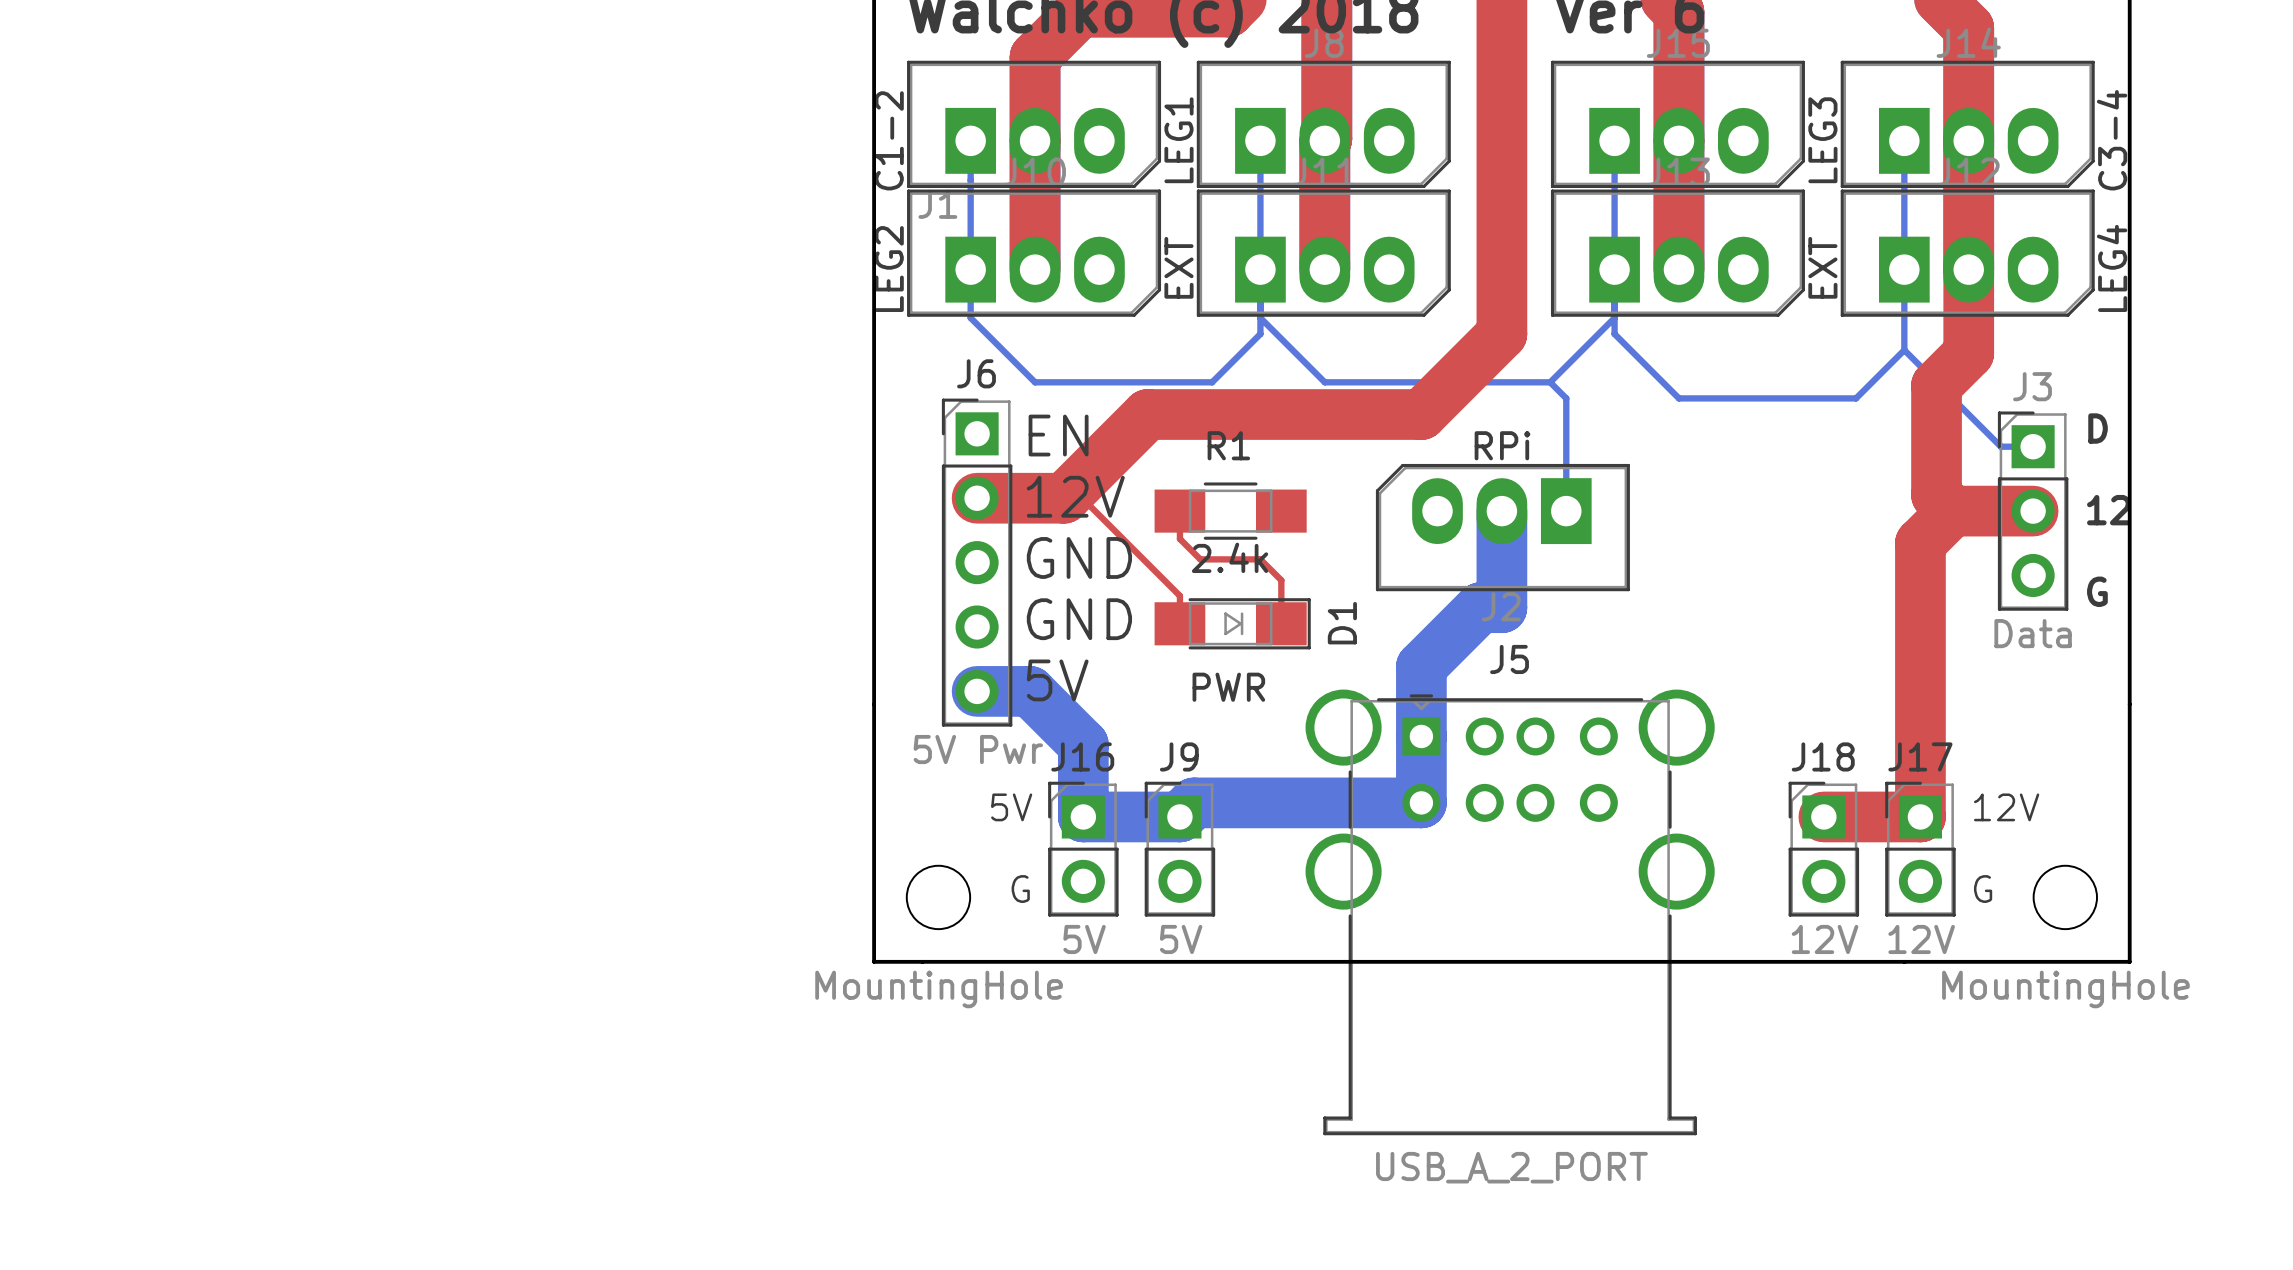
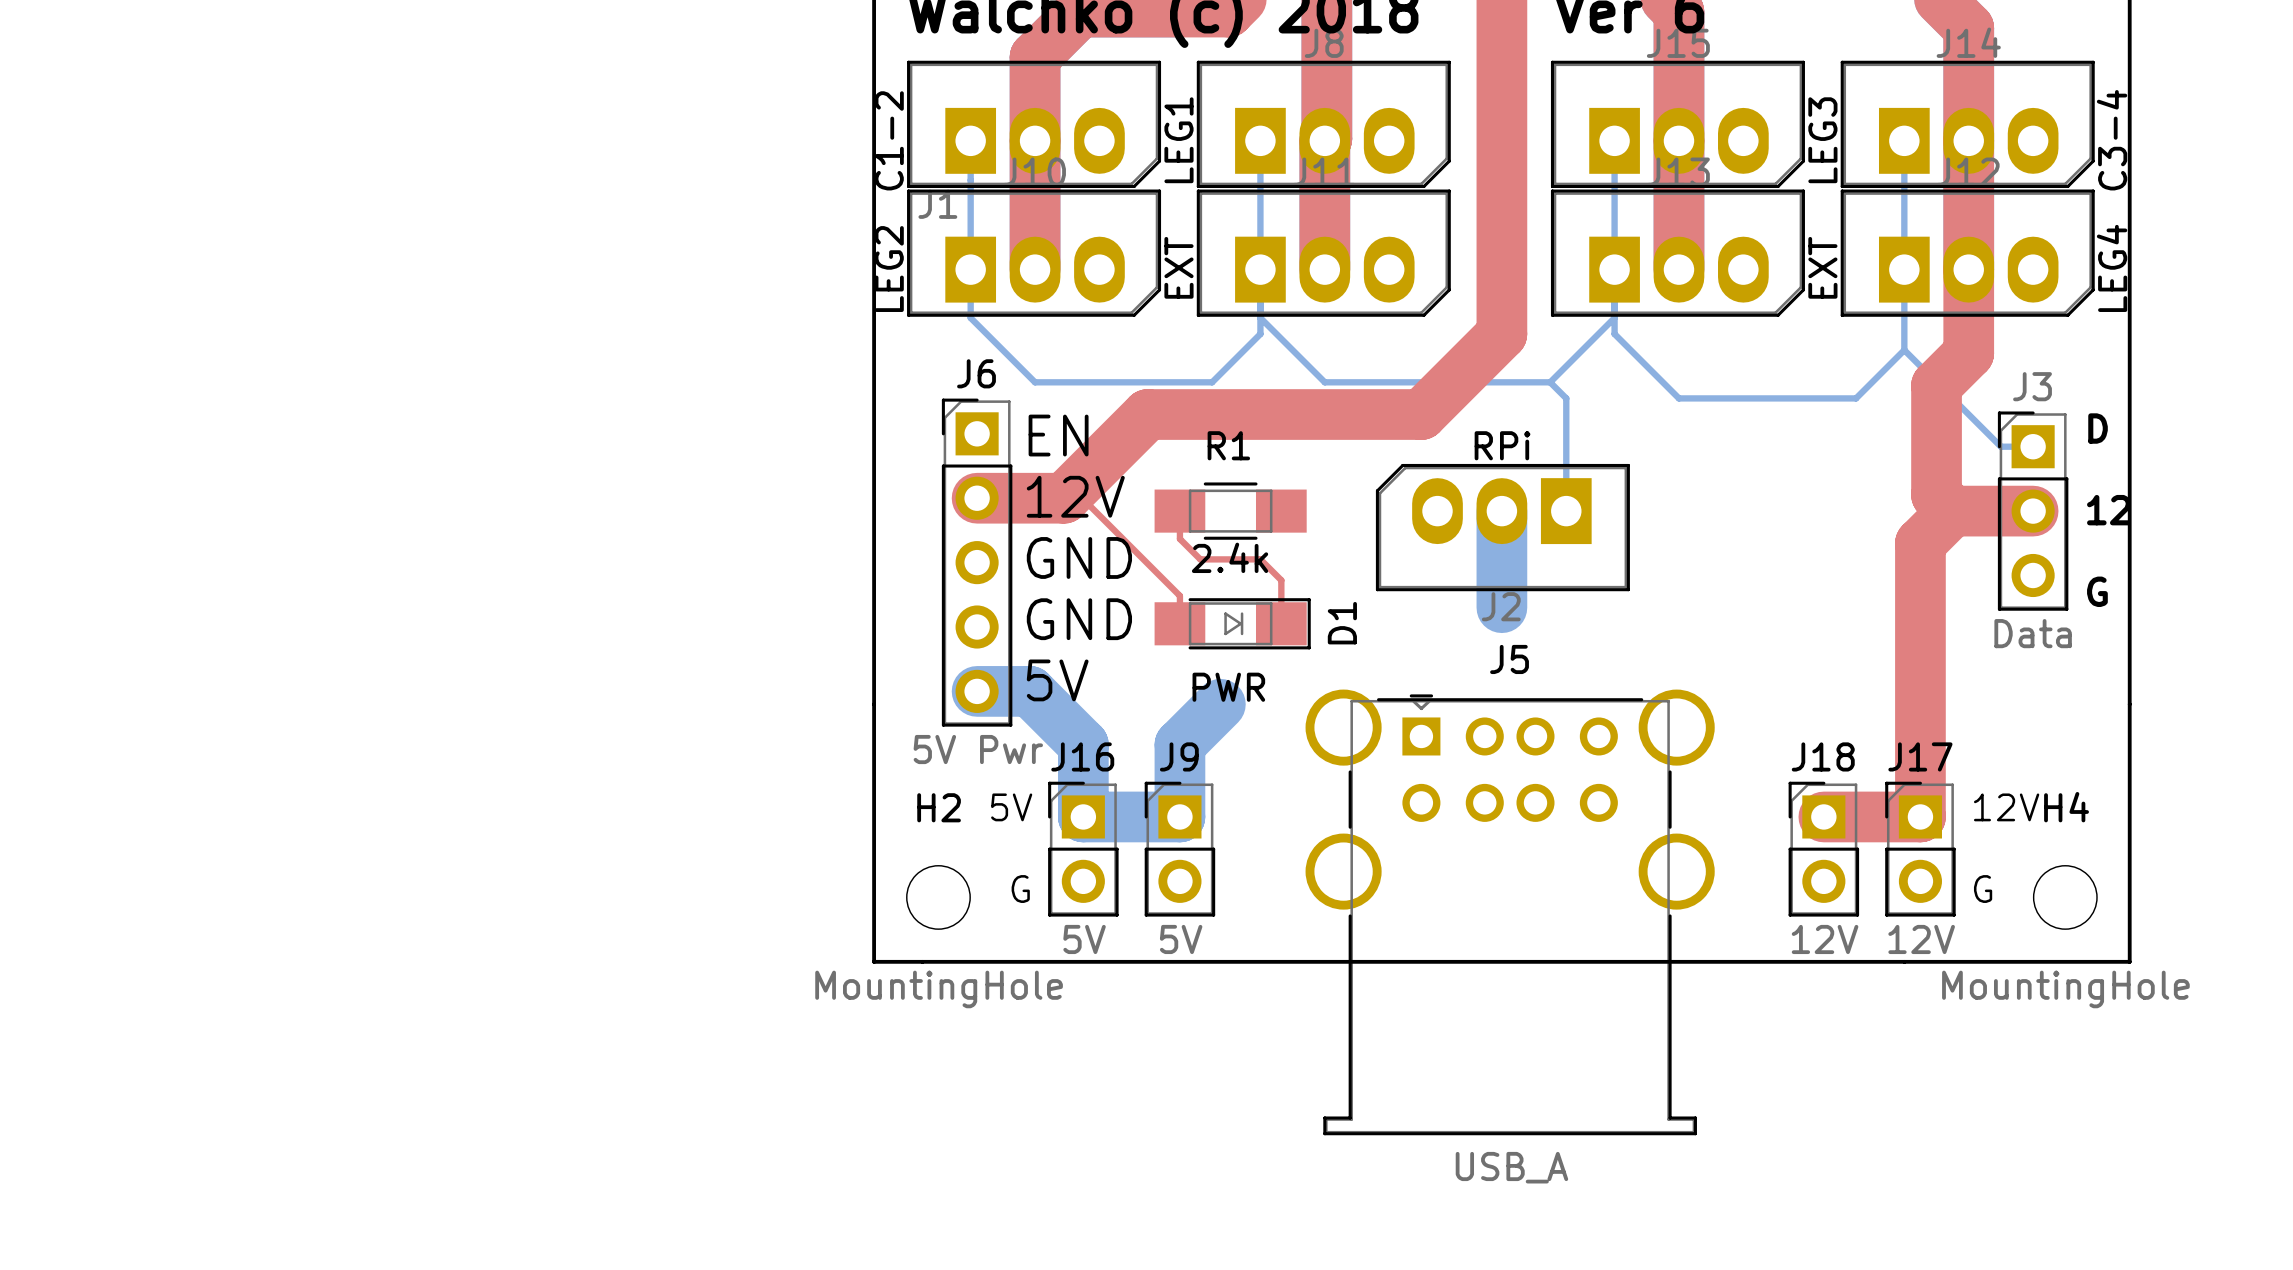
bottom track: (1501, 607) (1480, 607) (1421, 666) (1421, 802) (1194, 802) (1179, 816) -> (1220, 704) (1179, 744) (1179, 816)
H2 name: none -> H2 (939, 807)
H4 name: none -> H4 (2066, 807)
J5 value: USB_A_2_PORT (1511, 1167) -> USB_A (1511, 1167)

